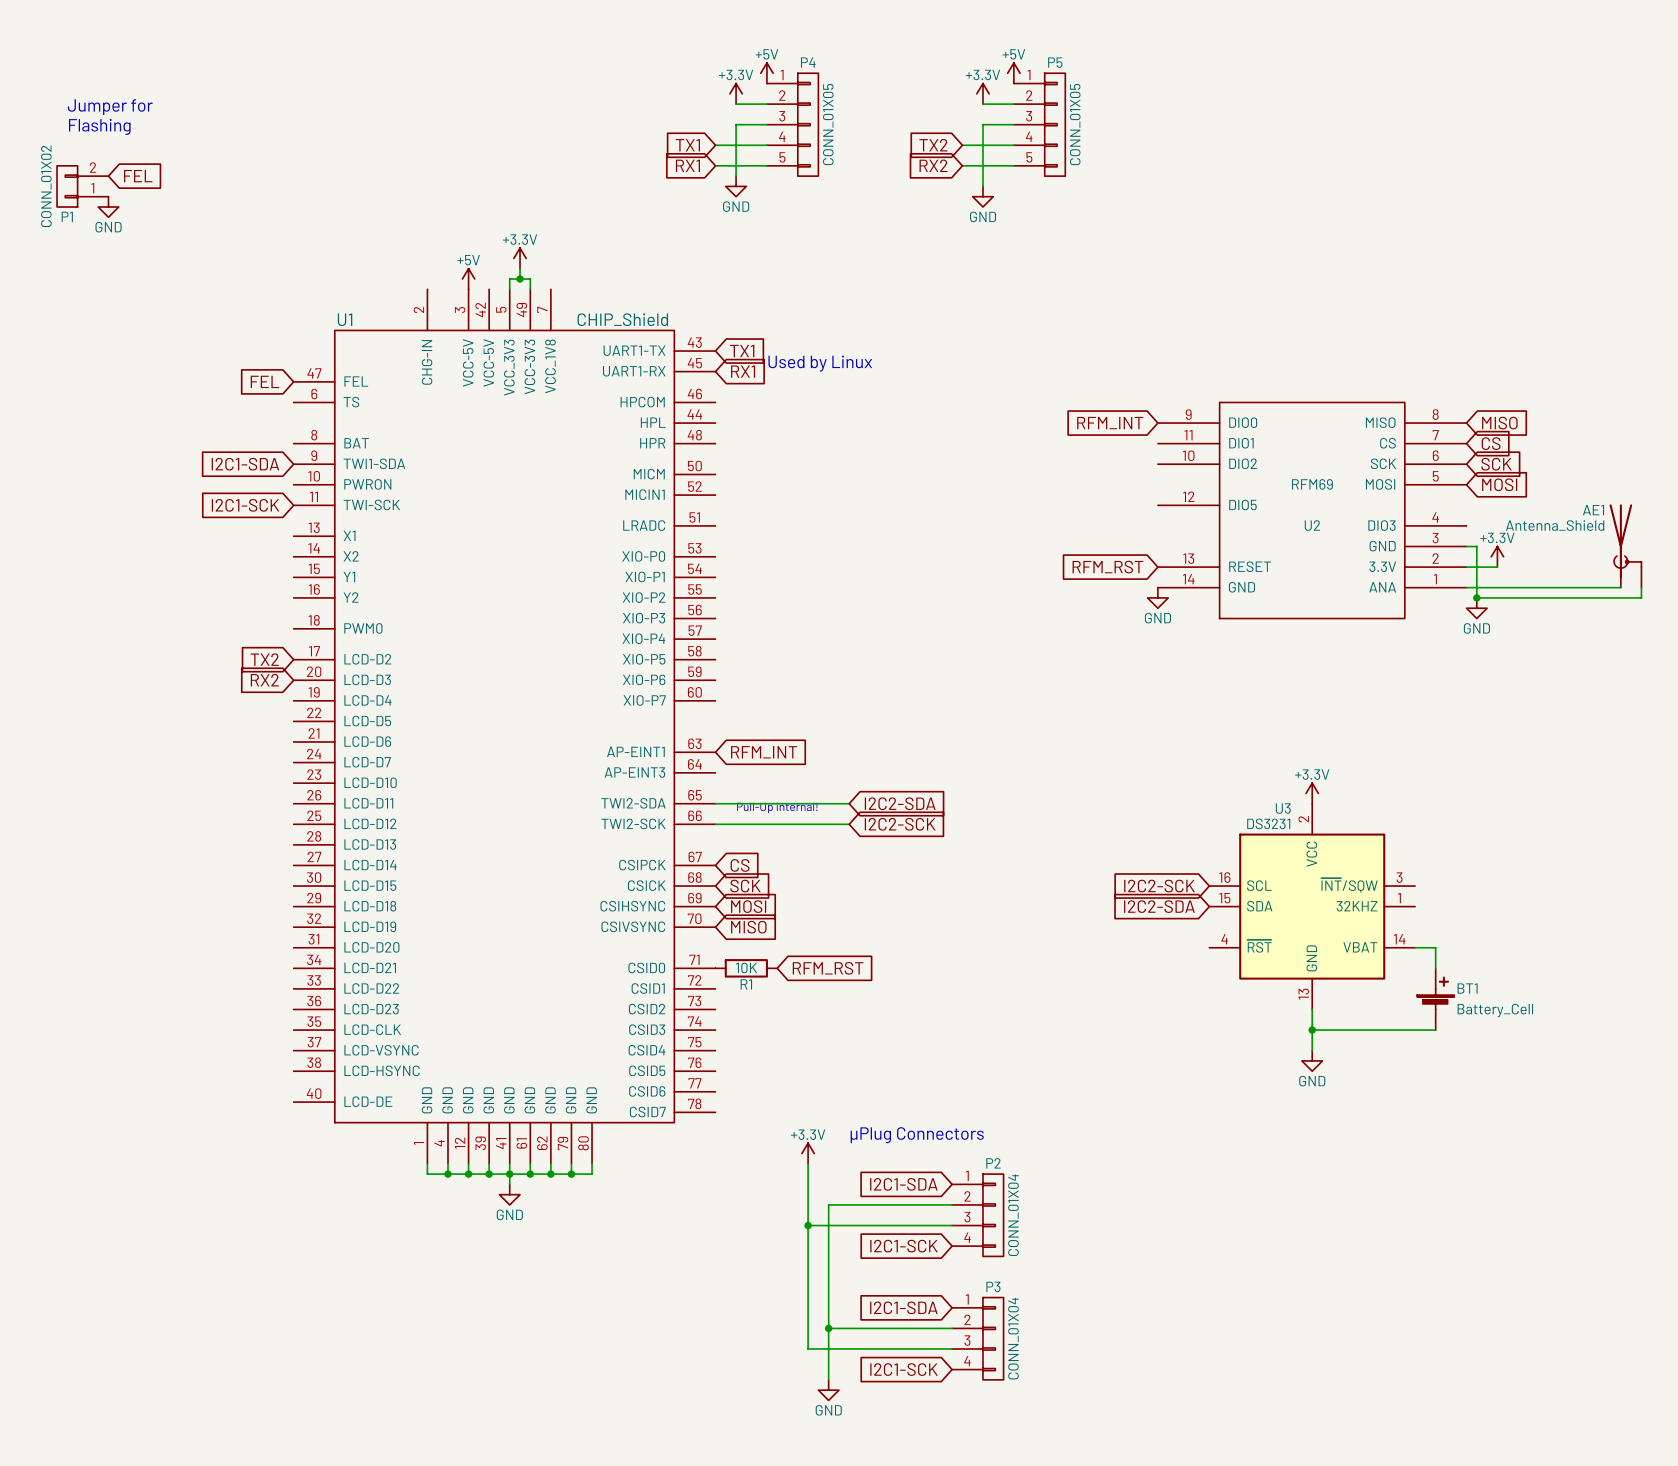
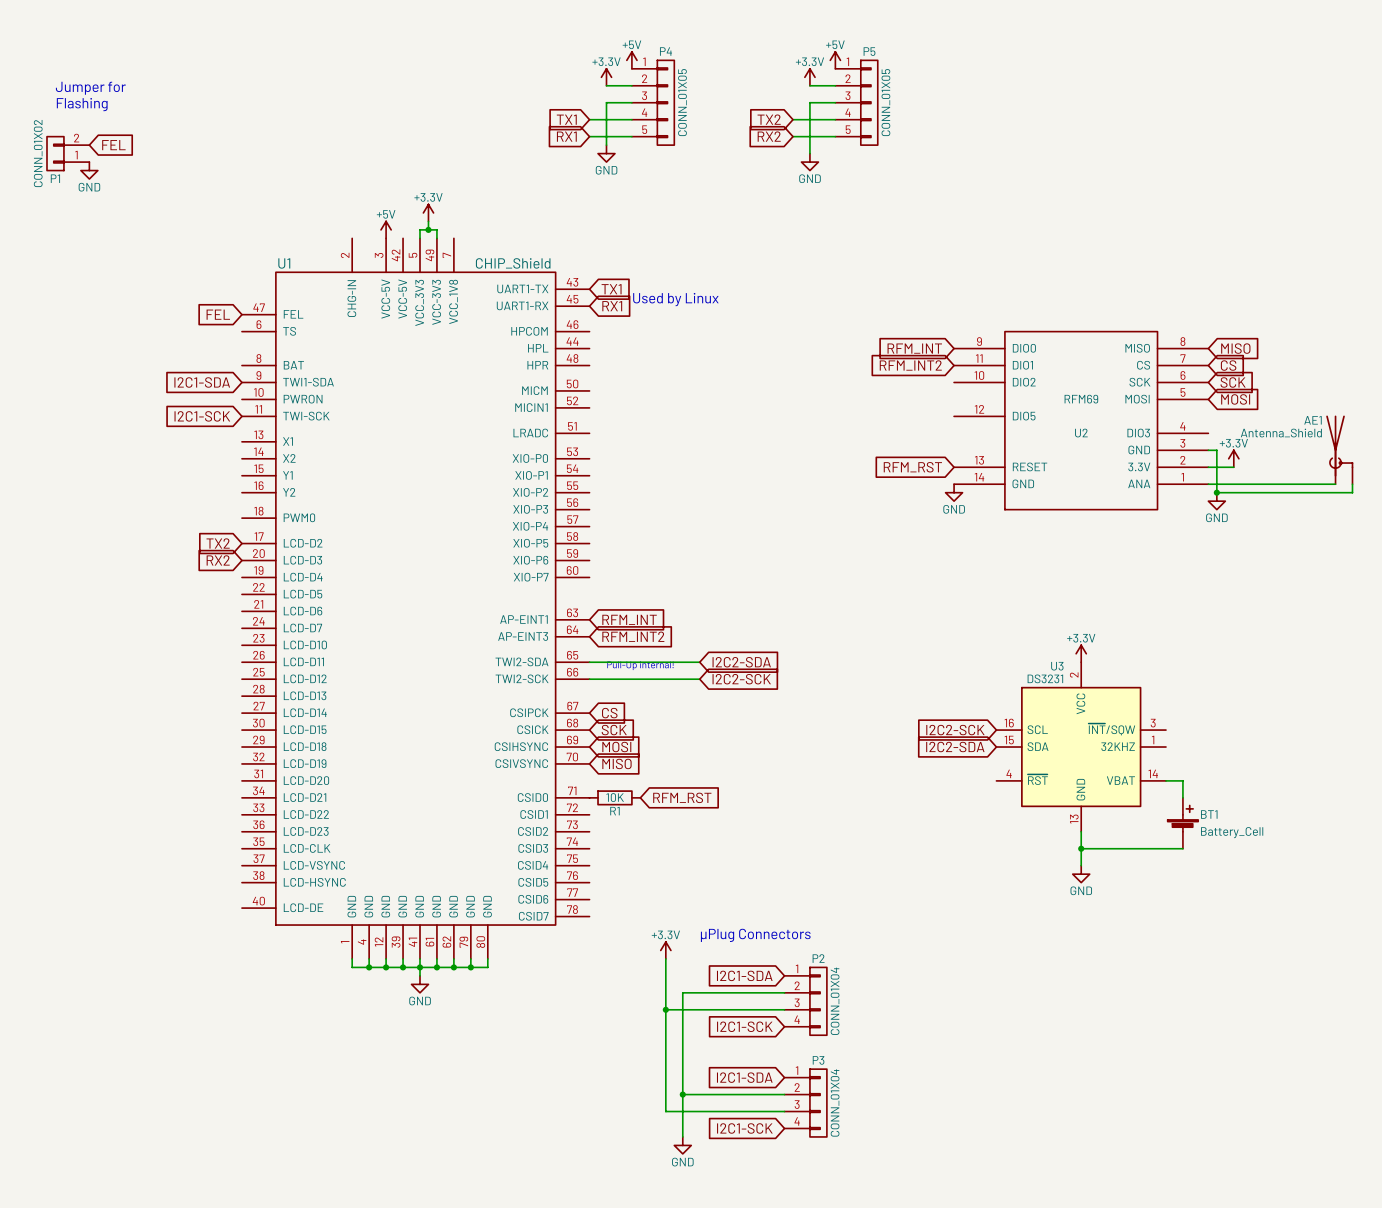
global label: none -> RFM_INT2 (910, 365)
global label: none -> RFM_INT2 (633, 636)

